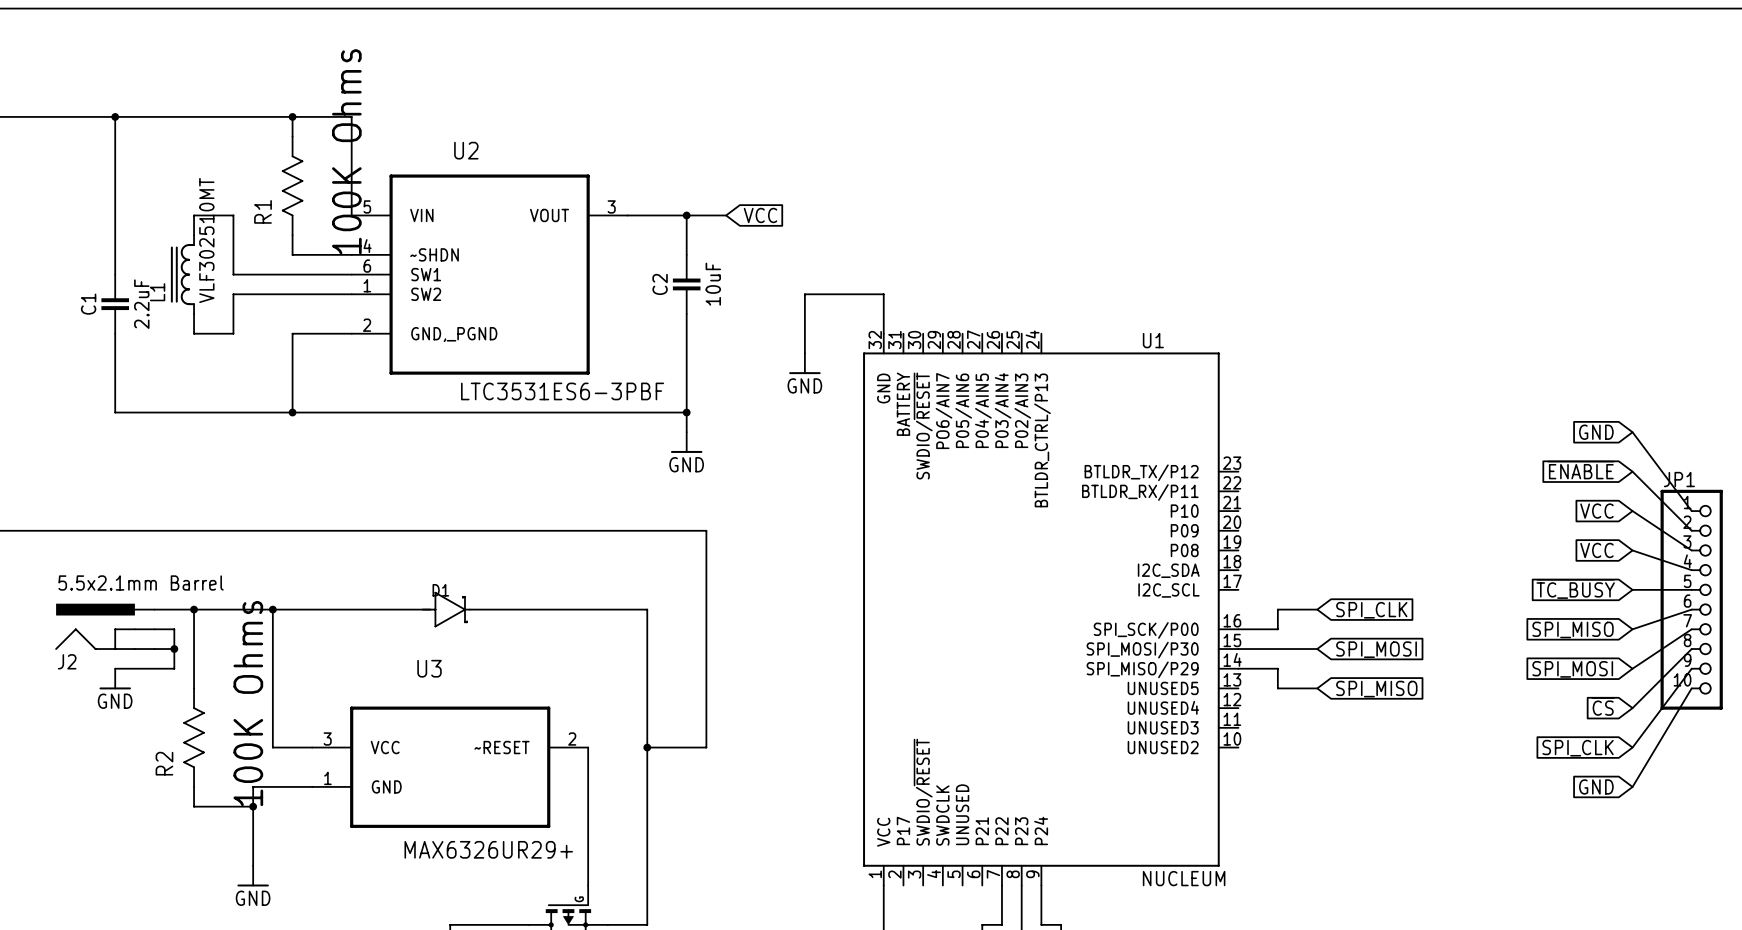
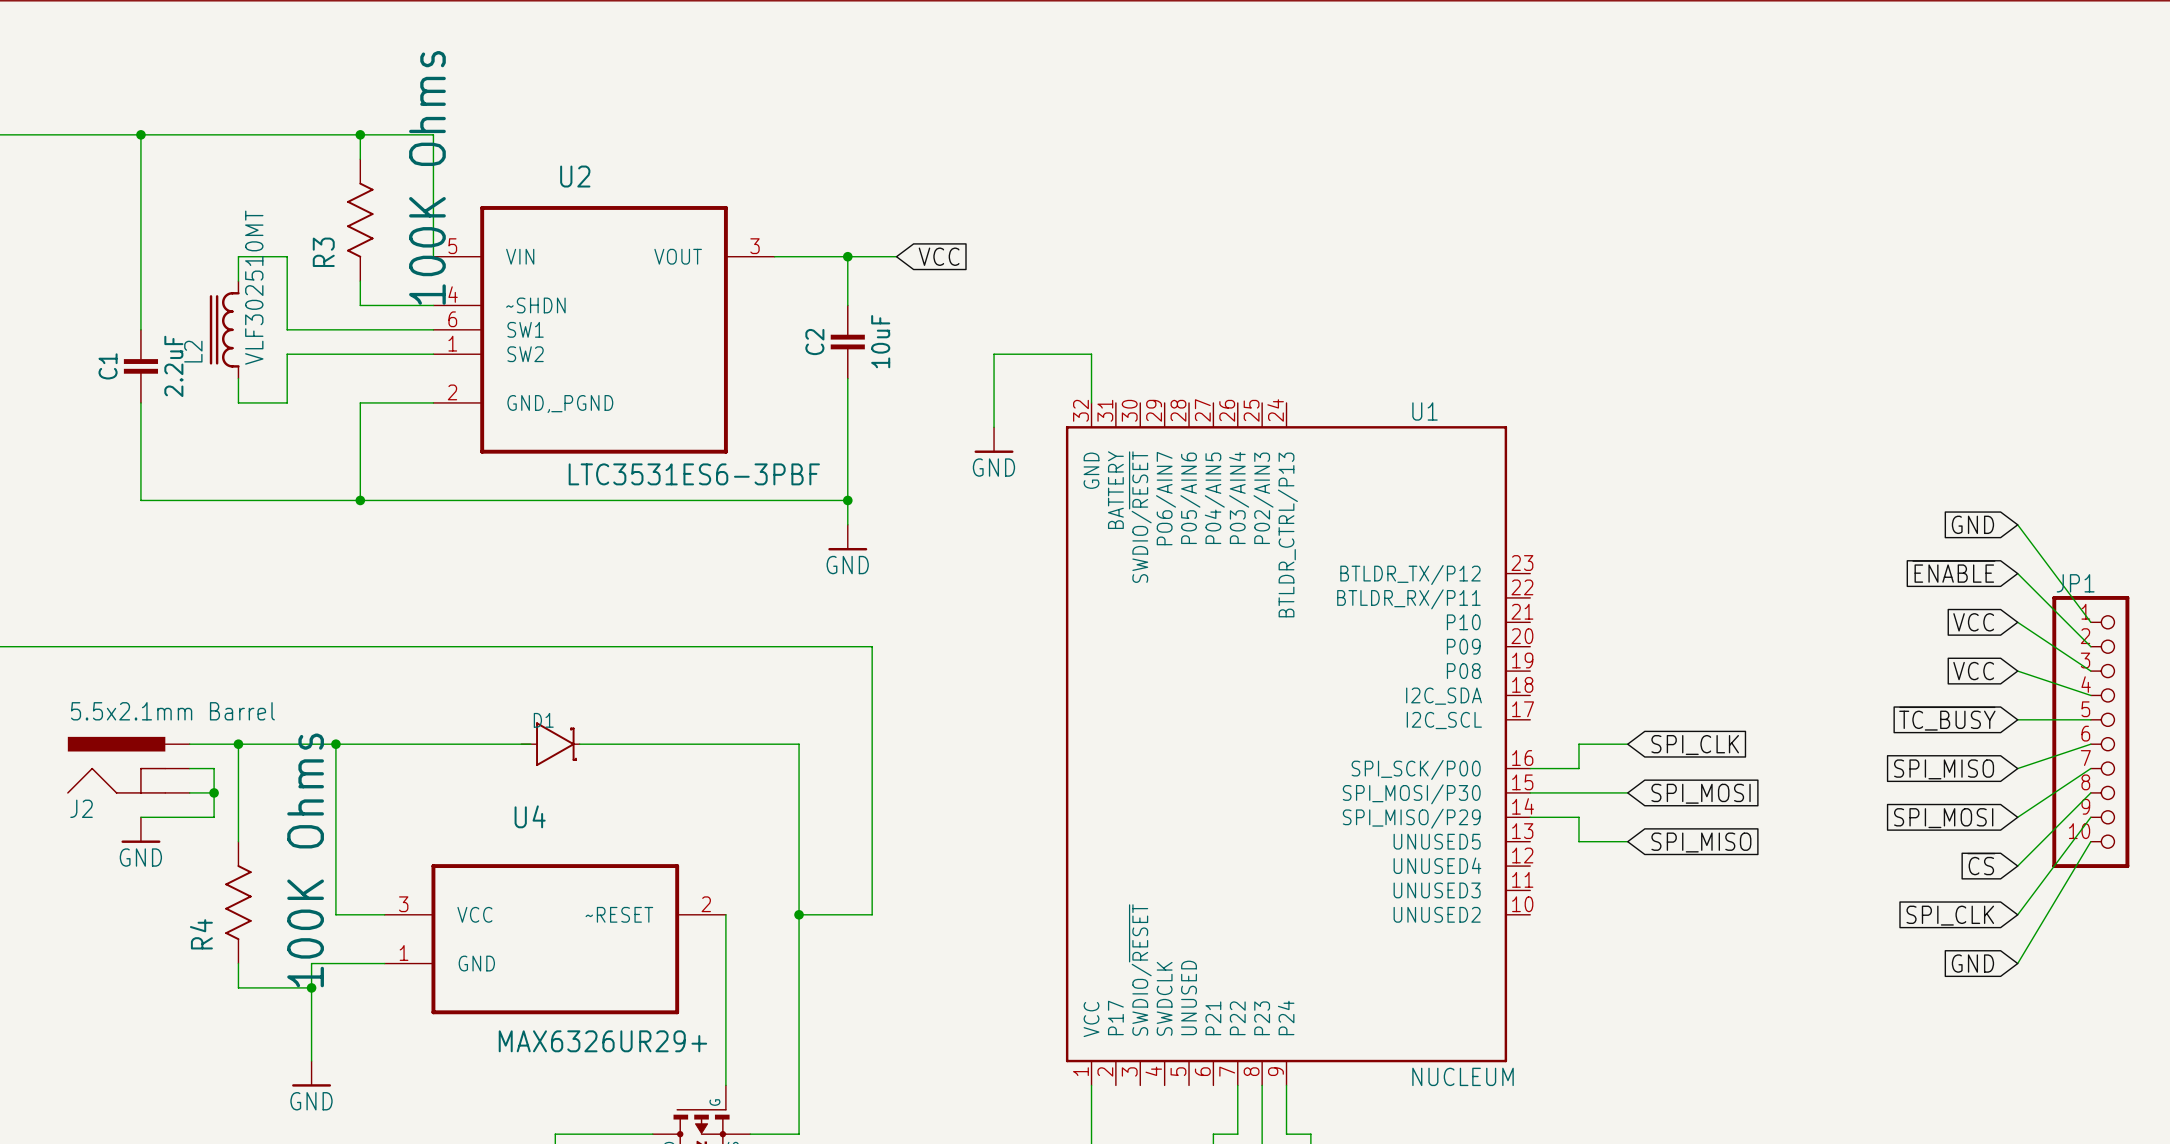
R1 name: R1 (263, 211) -> R3 (323, 252)
L1 name: L1 (157, 292) -> L2 (193, 351)
U3 name: U3 (429, 668) -> U4 (530, 816)
R2 name: R2 (164, 763) -> R4 (201, 934)

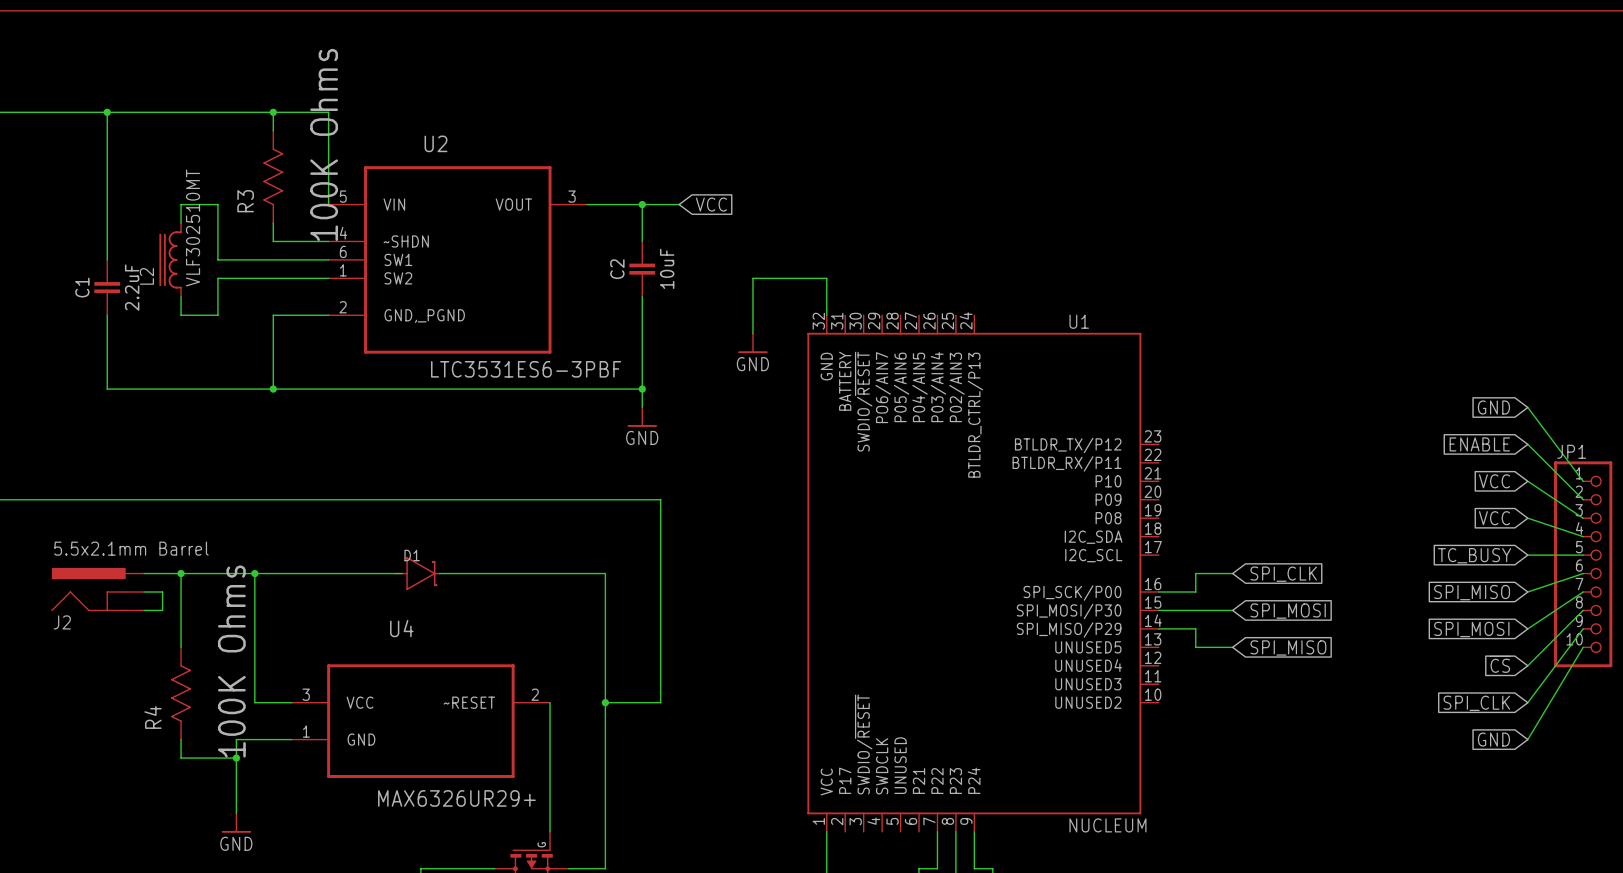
global label: ~{ENABLE} (1953, 571) -> ENABLE (1479, 444)
global label: ~{TC_BUSY} (1947, 718) -> TC_BUSY (1474, 555)
wire: (214, 792) (214, 817) (140, 817) -> none
junction: (214, 792) -> none
power symbol: GND (140, 830) -> none

